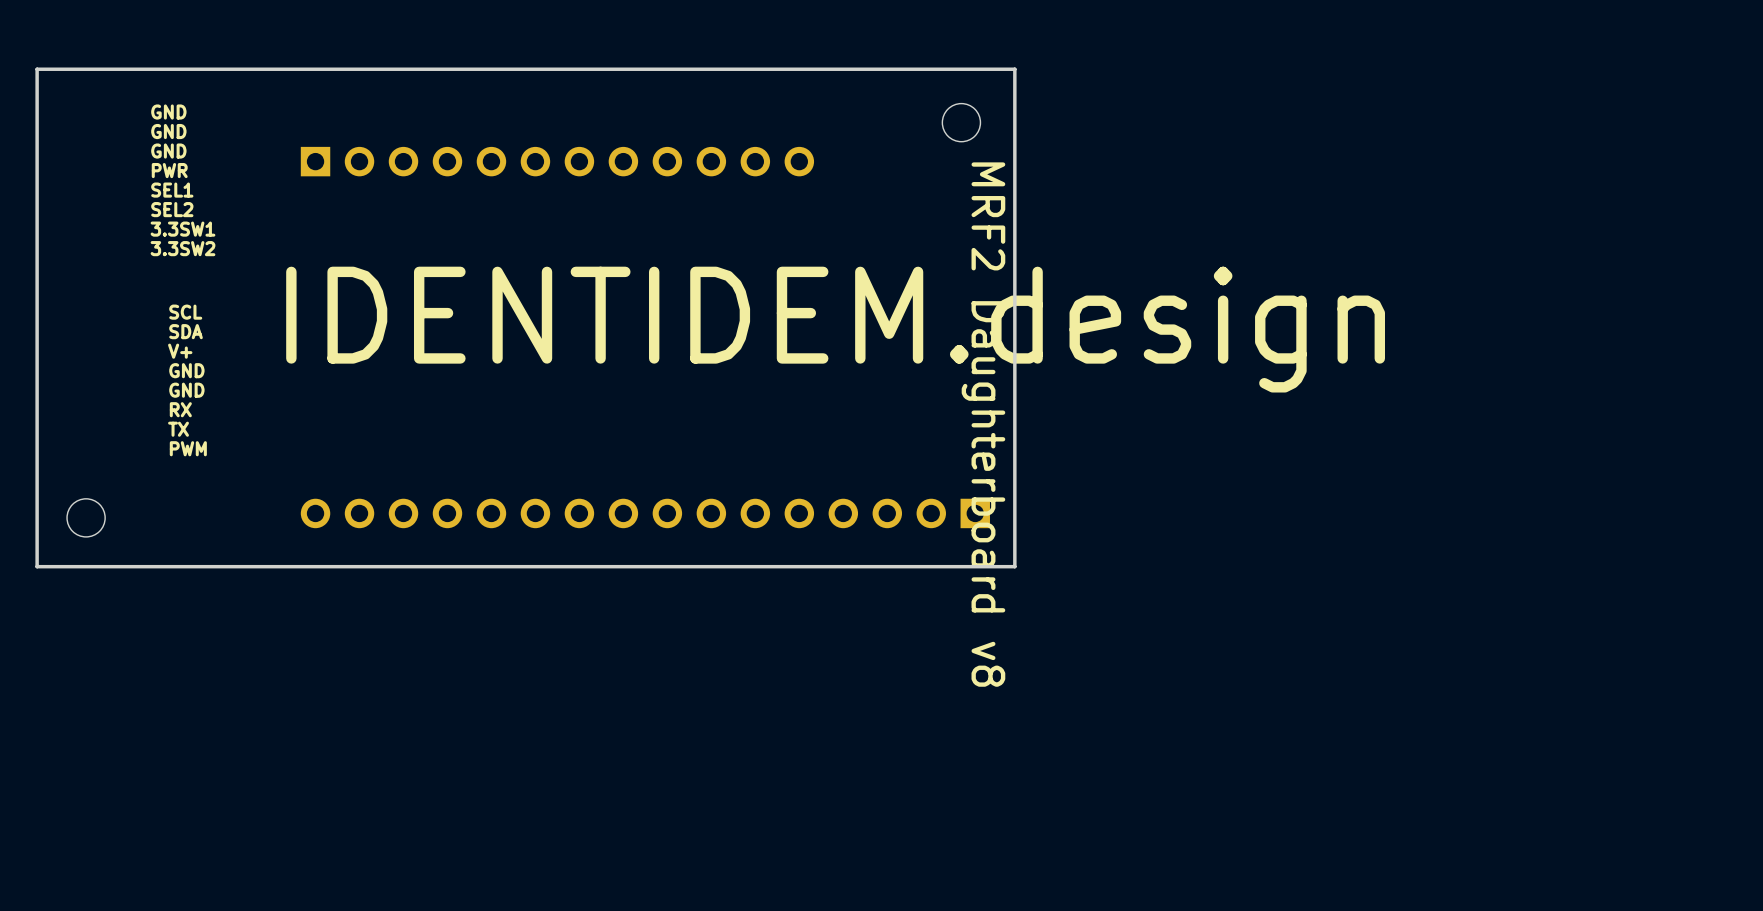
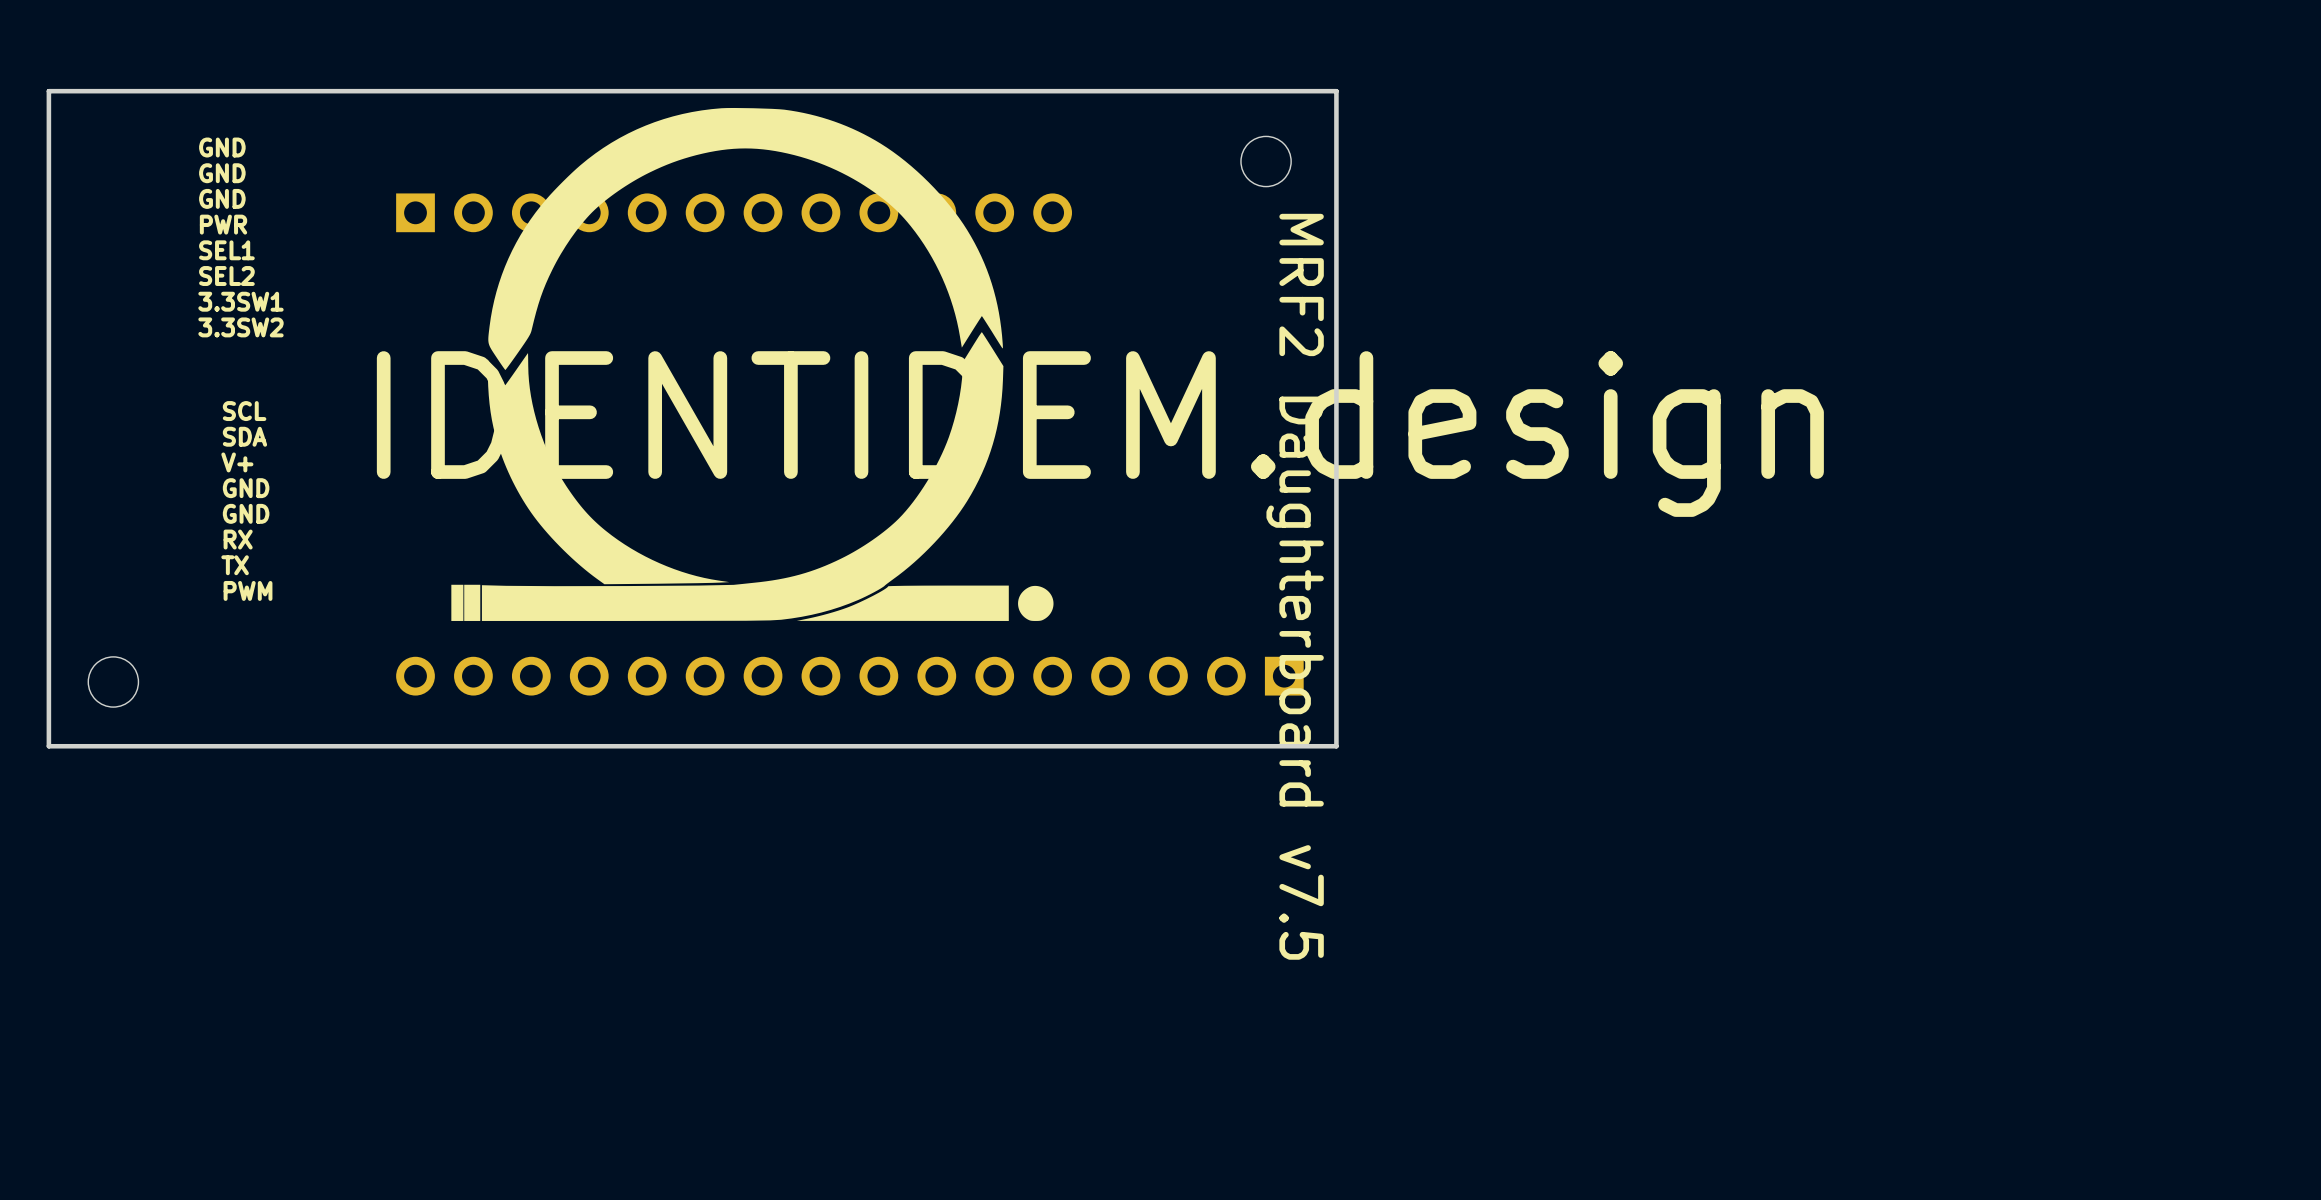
drawing: none -> [451, 107, 1054, 621]
text: MRF2 Daughterboard v8 (983, 424) -> MRF2 Daughterboard v7.5 (1295, 586)

